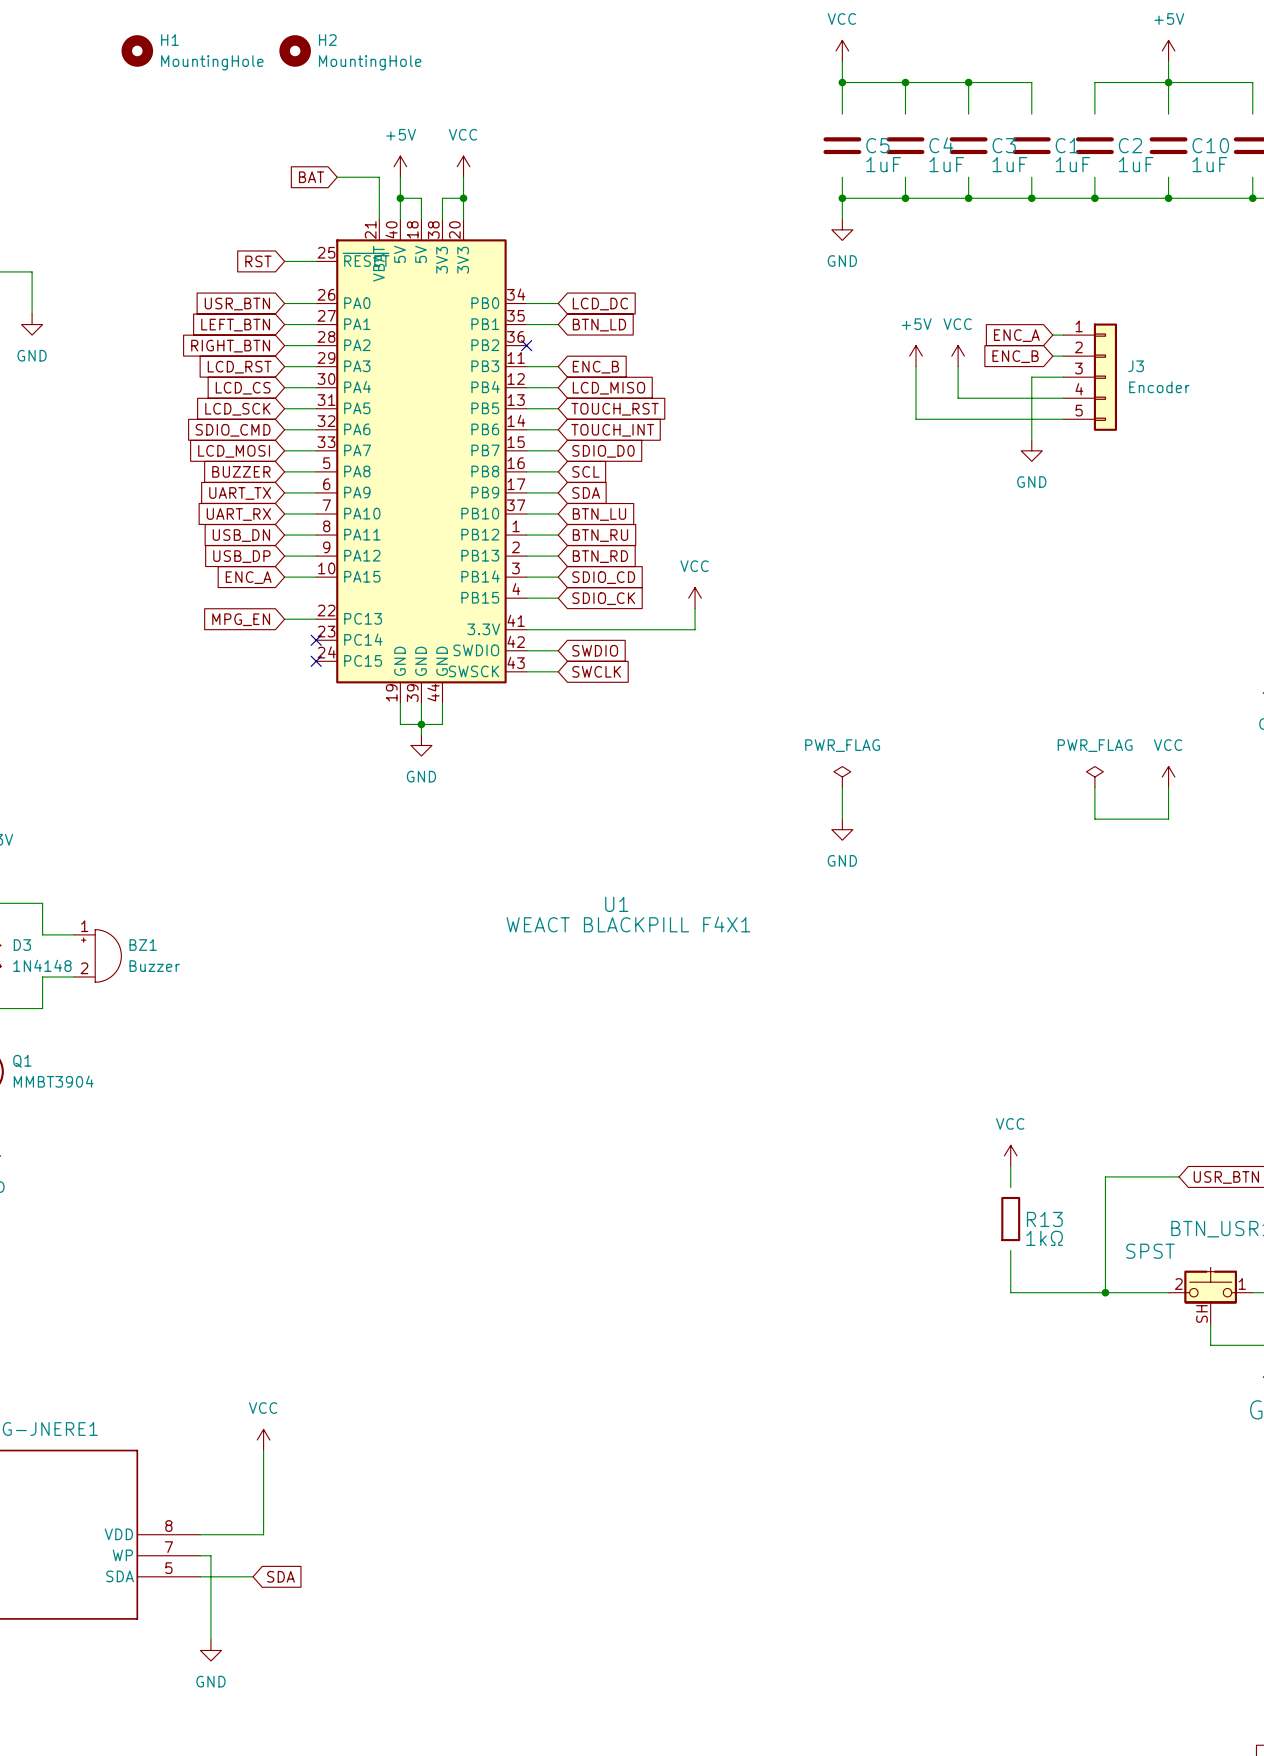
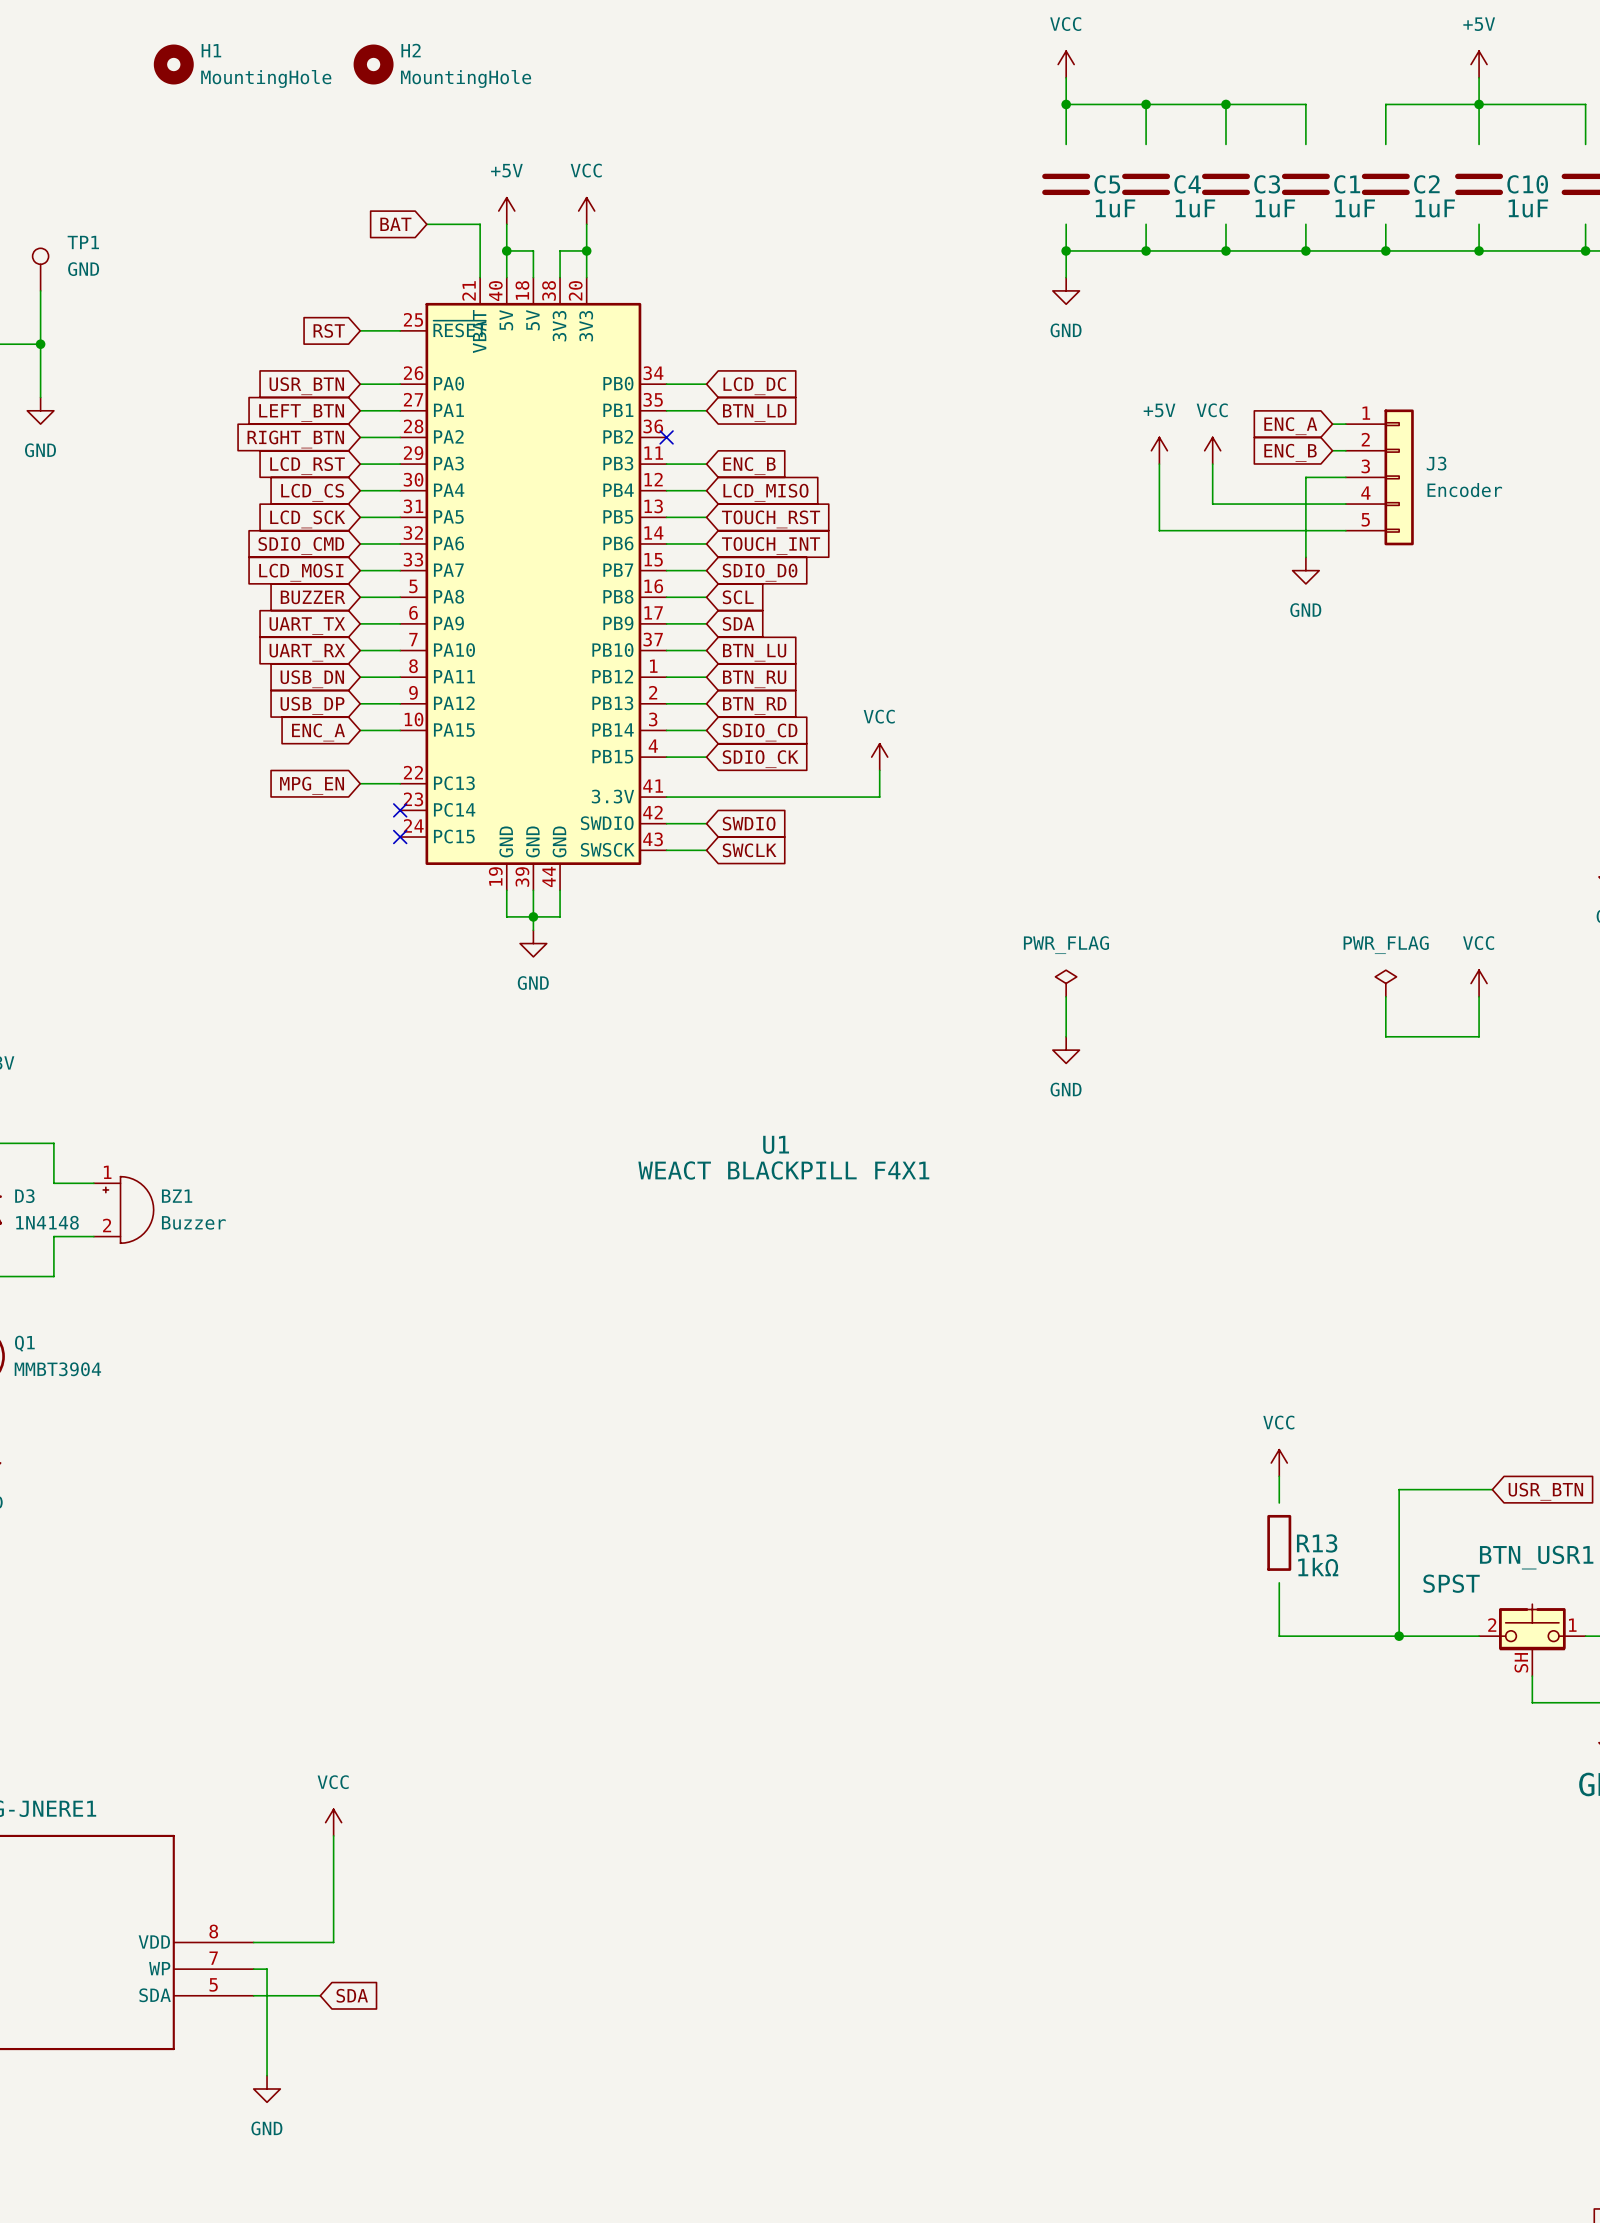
TP1: none -> GND (40, 269)
wire: none -> (40, 290) (40, 344)
junction: none -> (40, 344)

